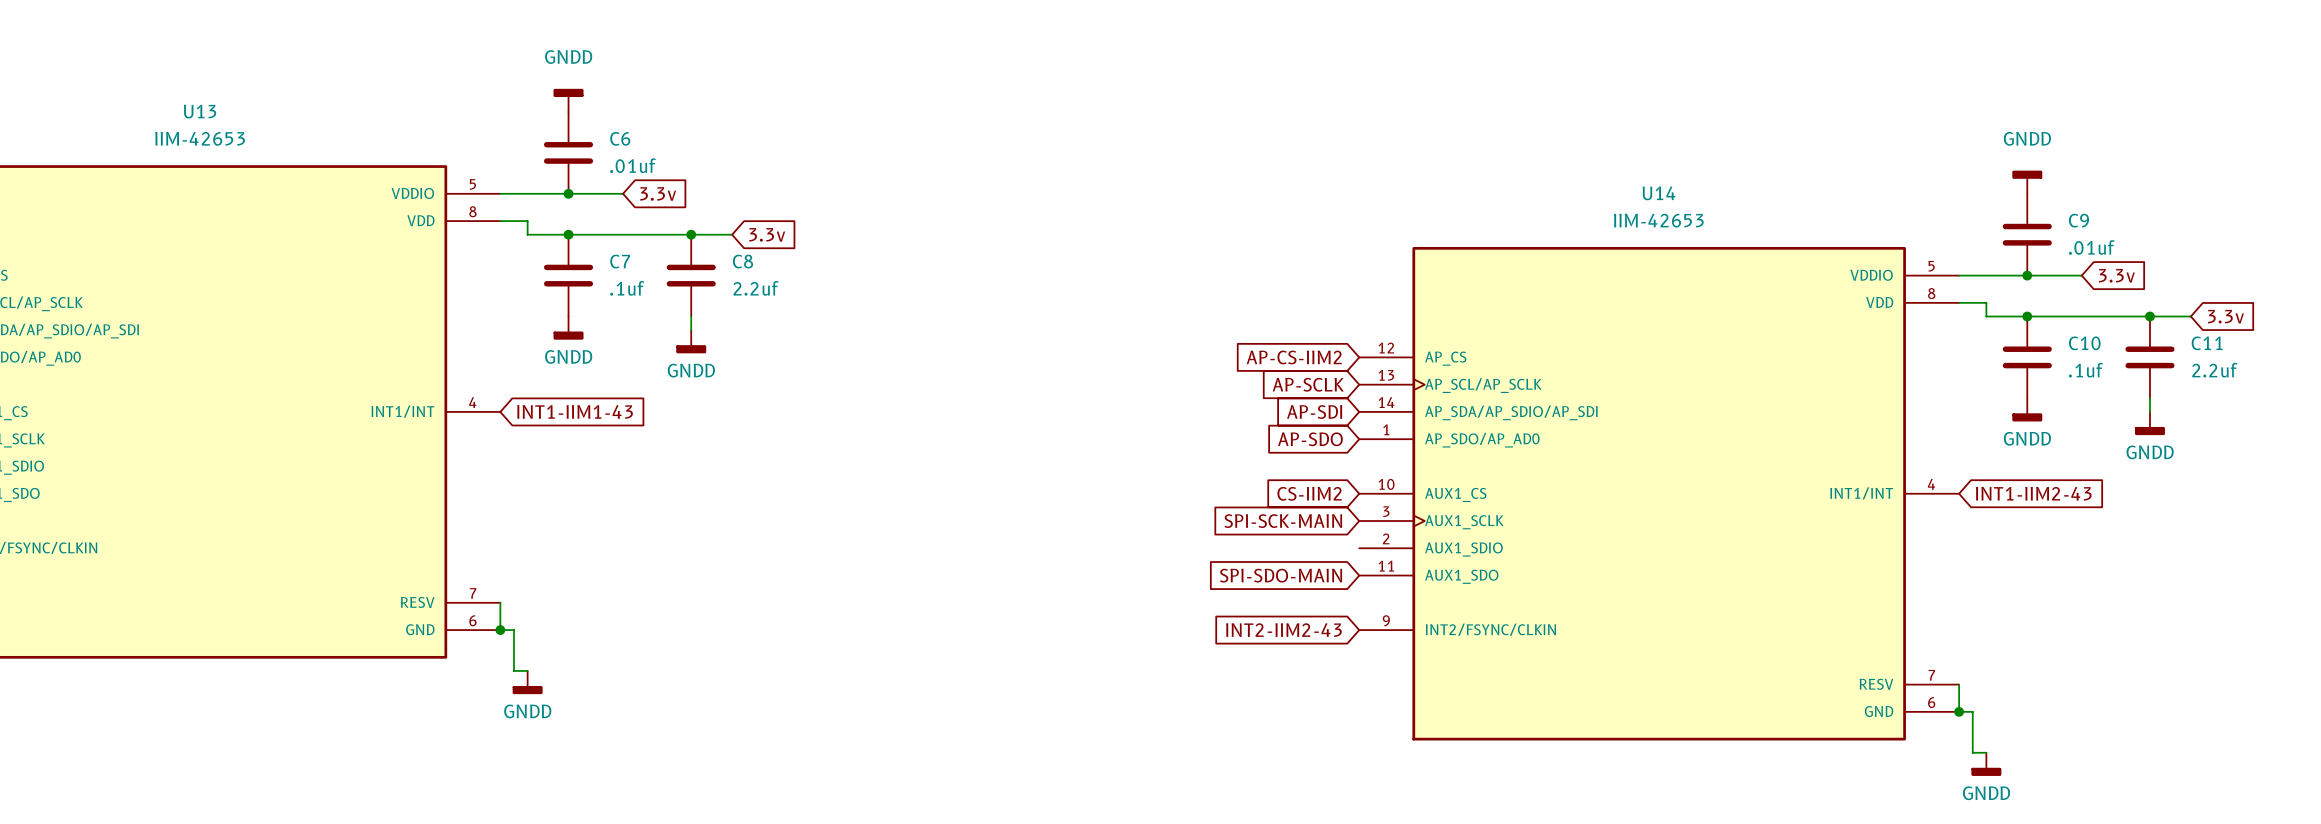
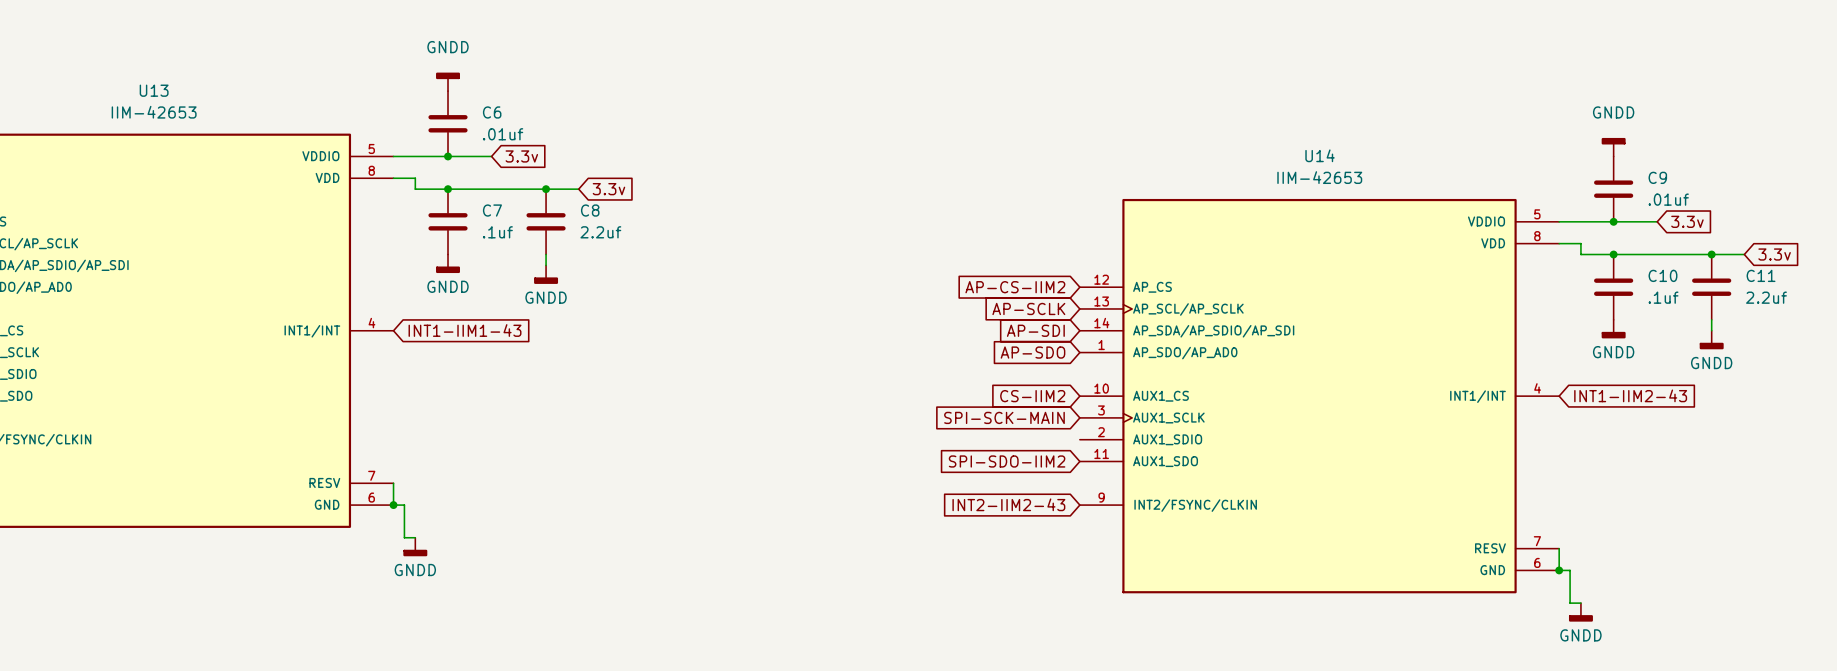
global label: SPI-SDO-MAIN (1281, 575) -> SPI-SDO-IIM2 (1007, 461)

